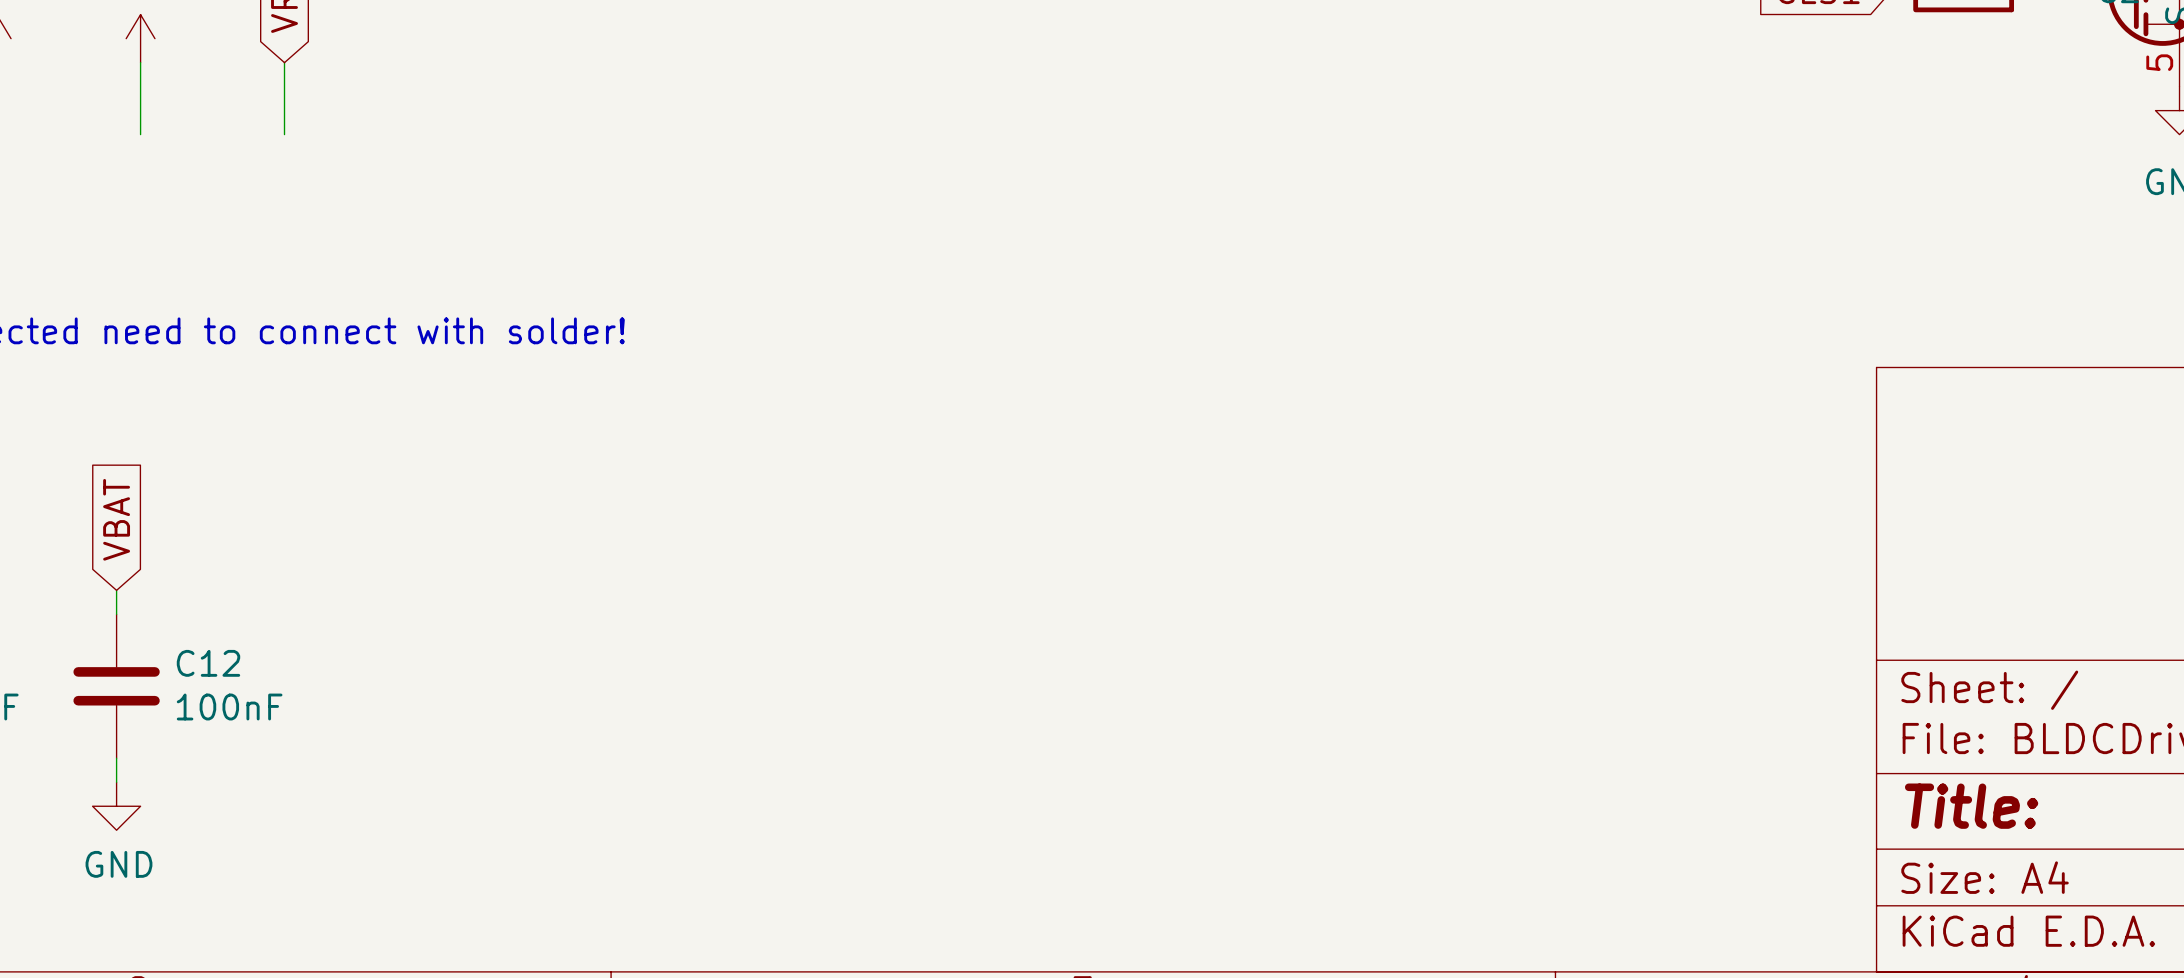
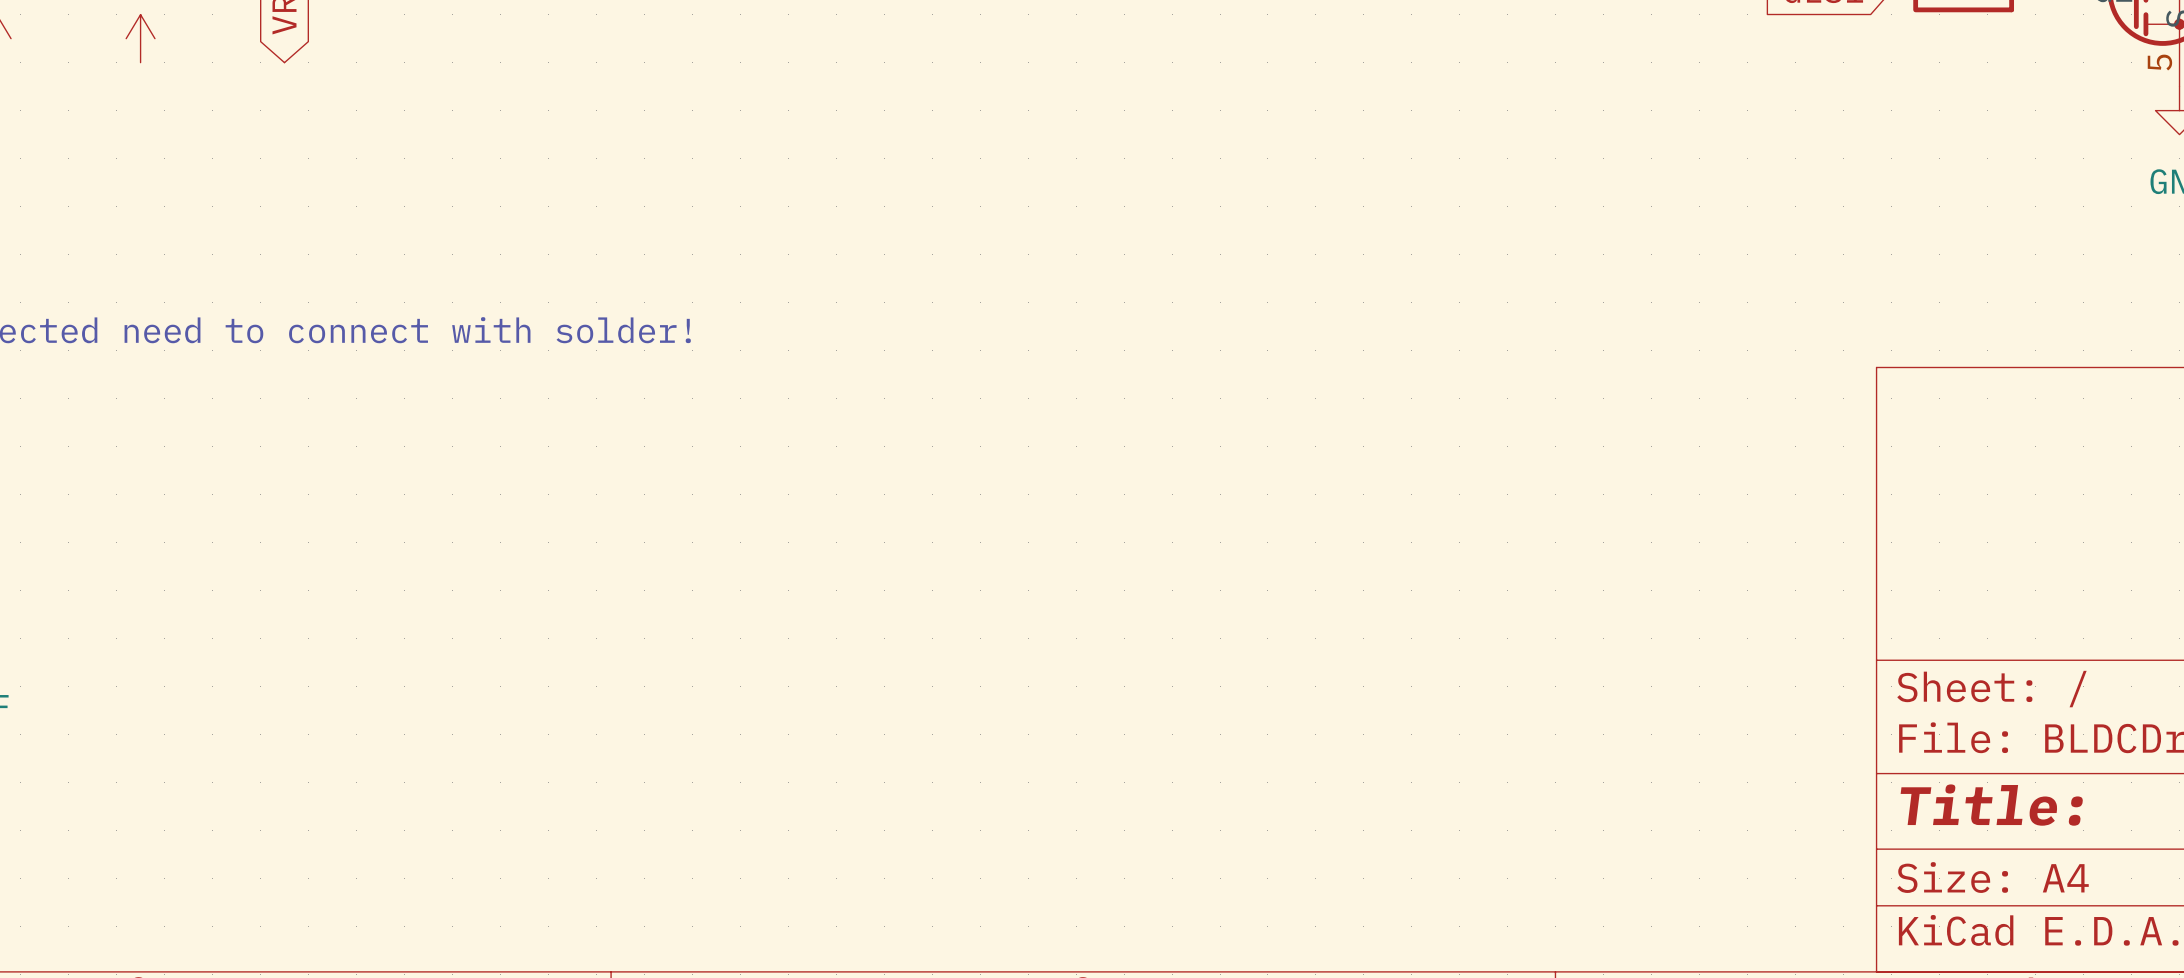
wire: (140, 62) (140, 134) -> none
wire: (284, 62) (284, 134) -> none
global label: VBAT (116, 519) -> none
wire: (116, 590) (116, 614) -> none
C12: 100nF (116, 686) -> none
wire: (116, 758) (116, 782) -> none
power symbol: GND (116, 806) -> none

